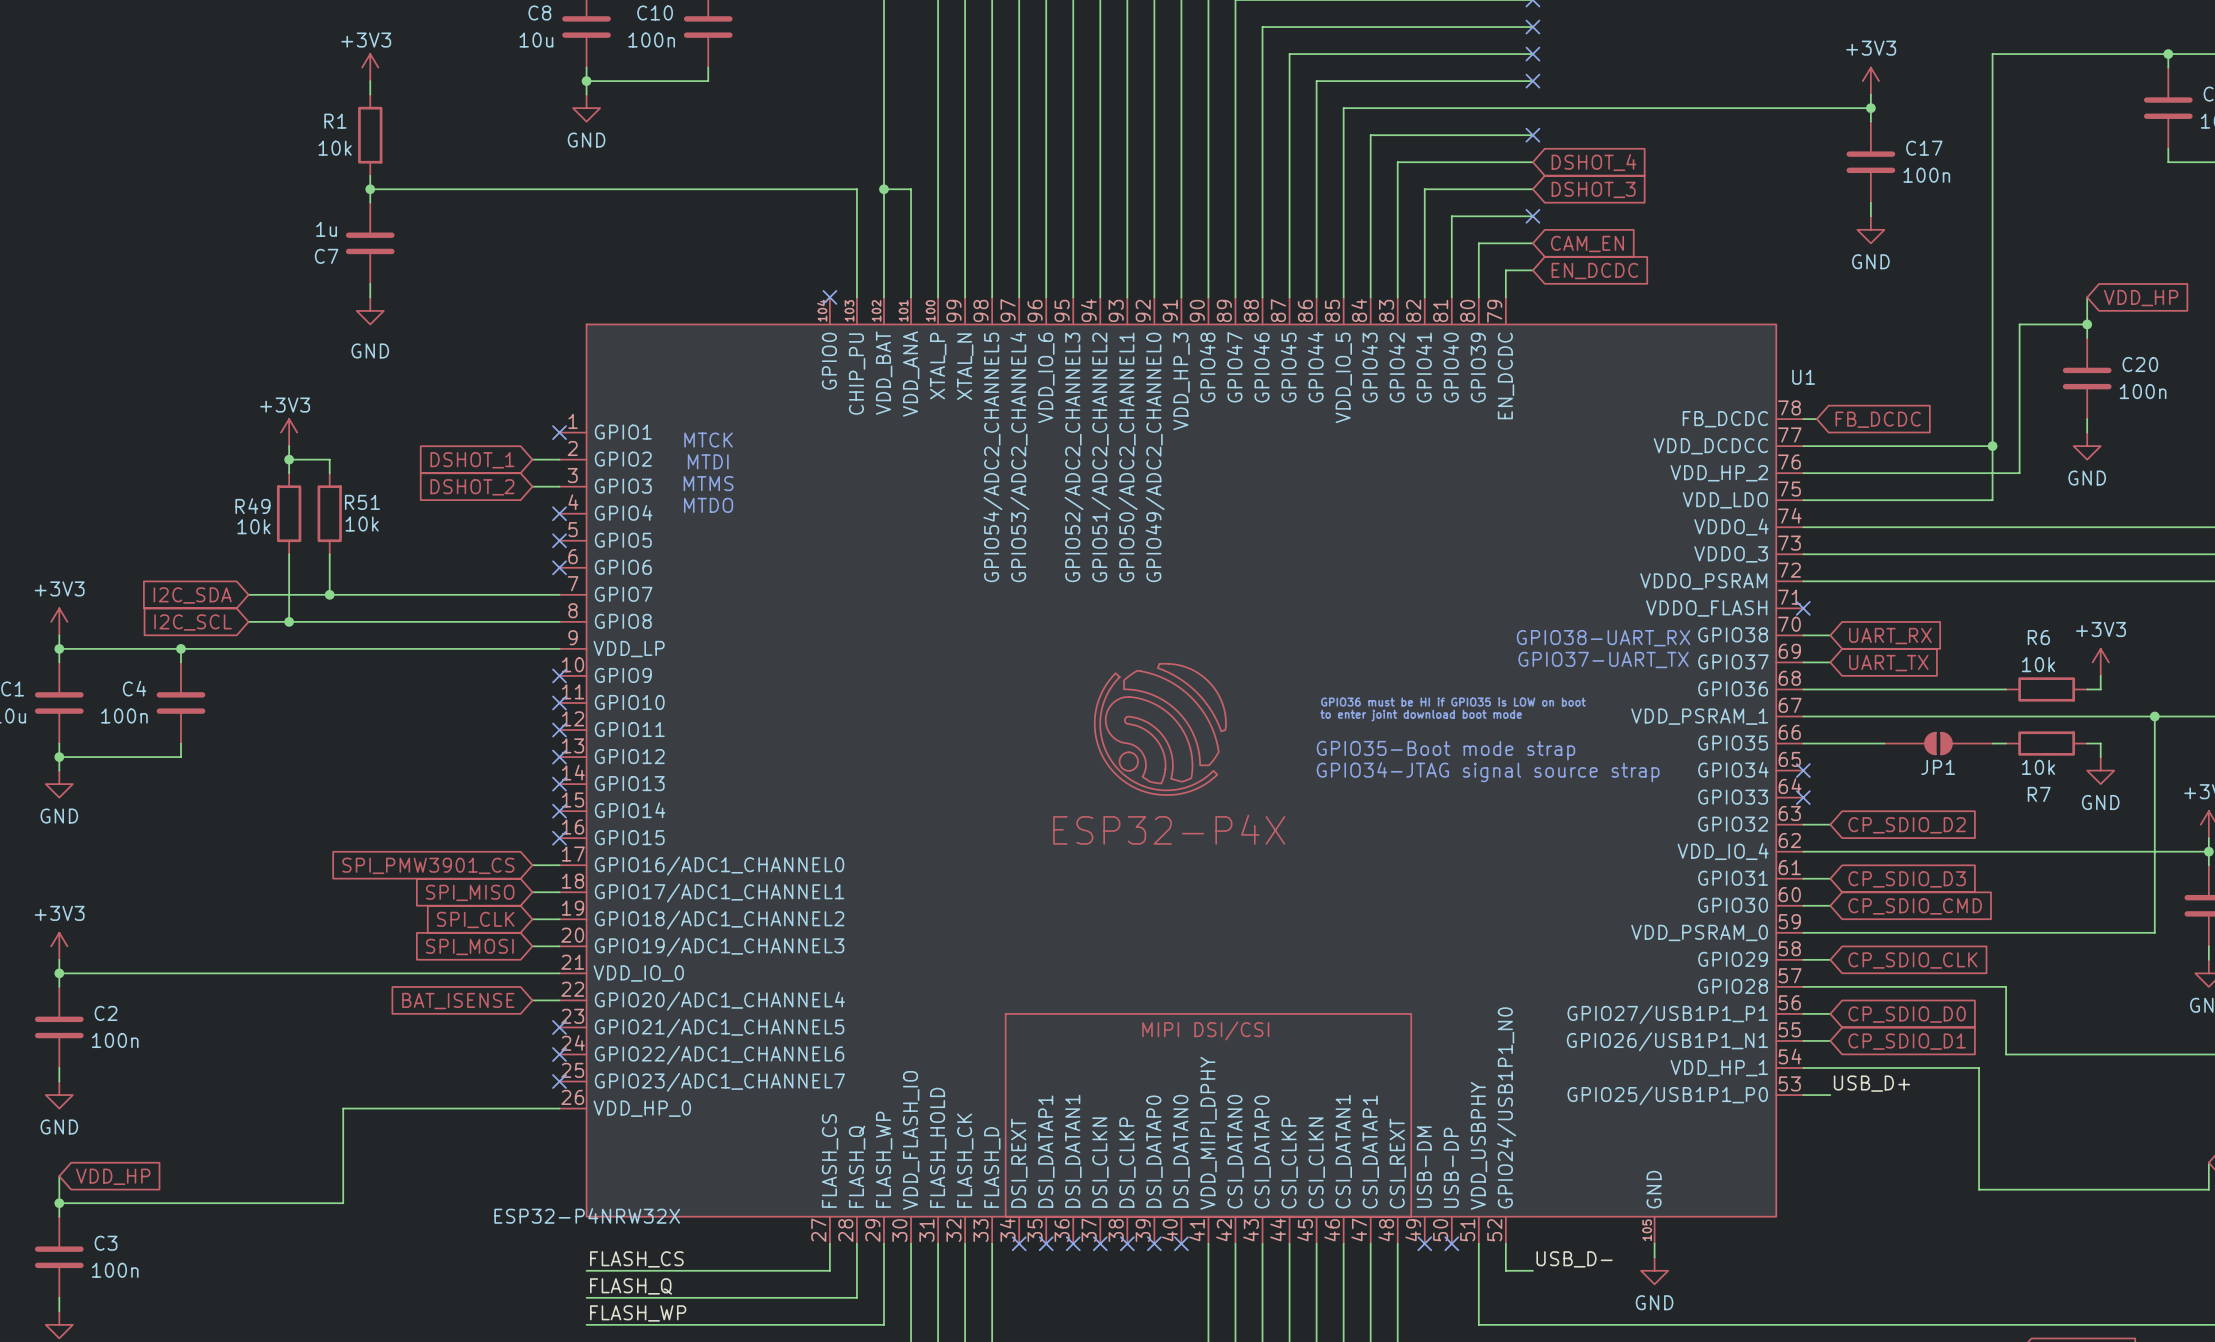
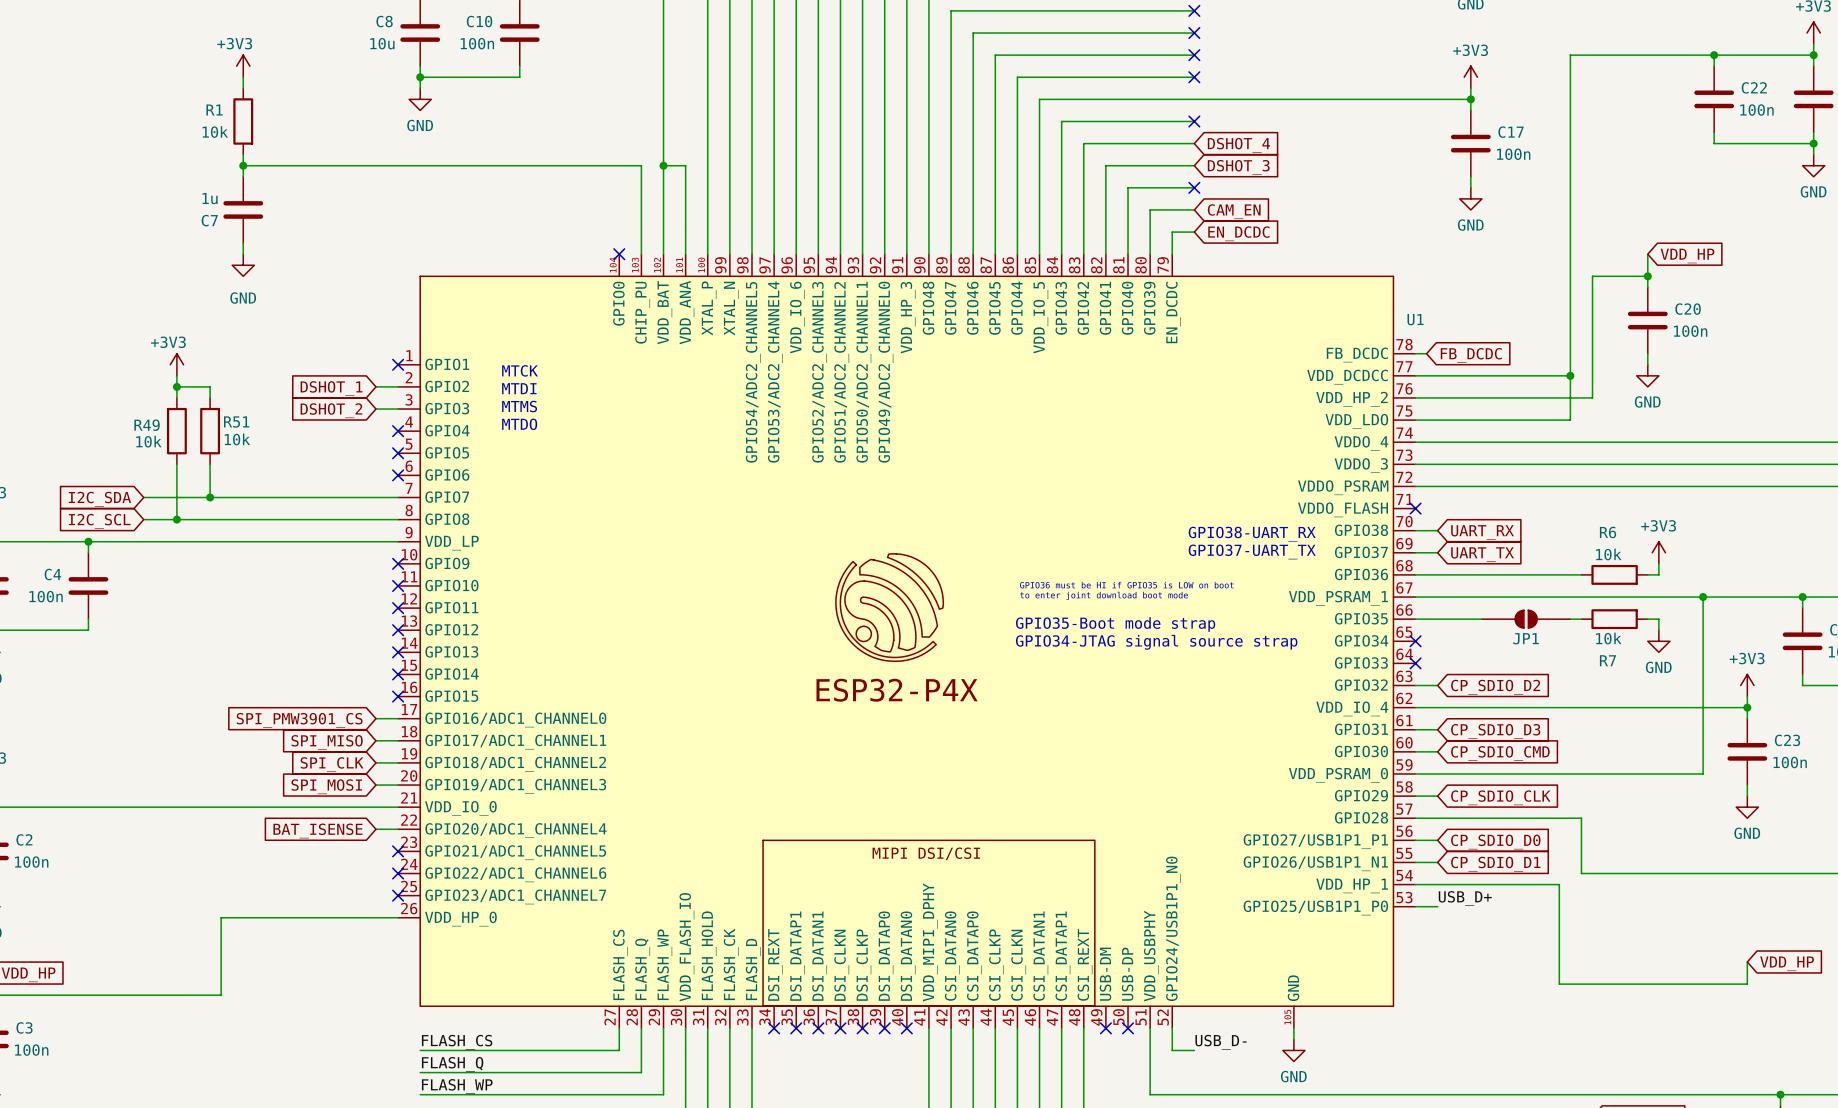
U1 value: ESP32-P4NRW32X (587, 1215) -> none

